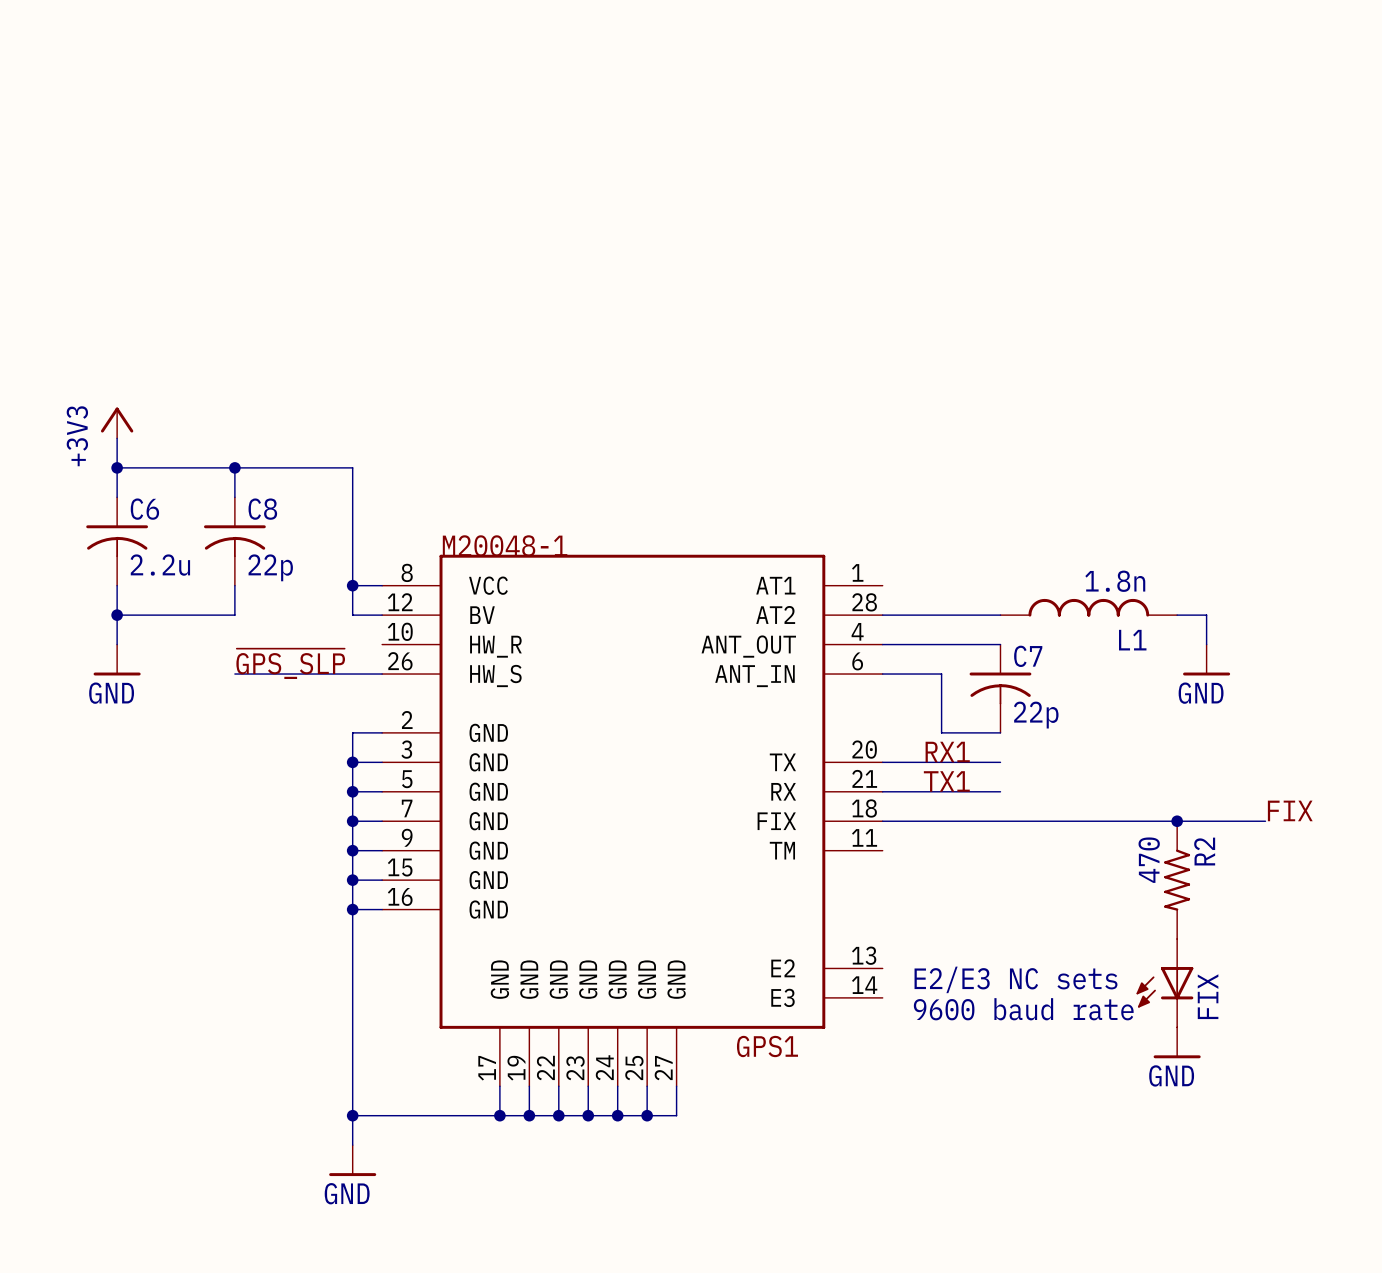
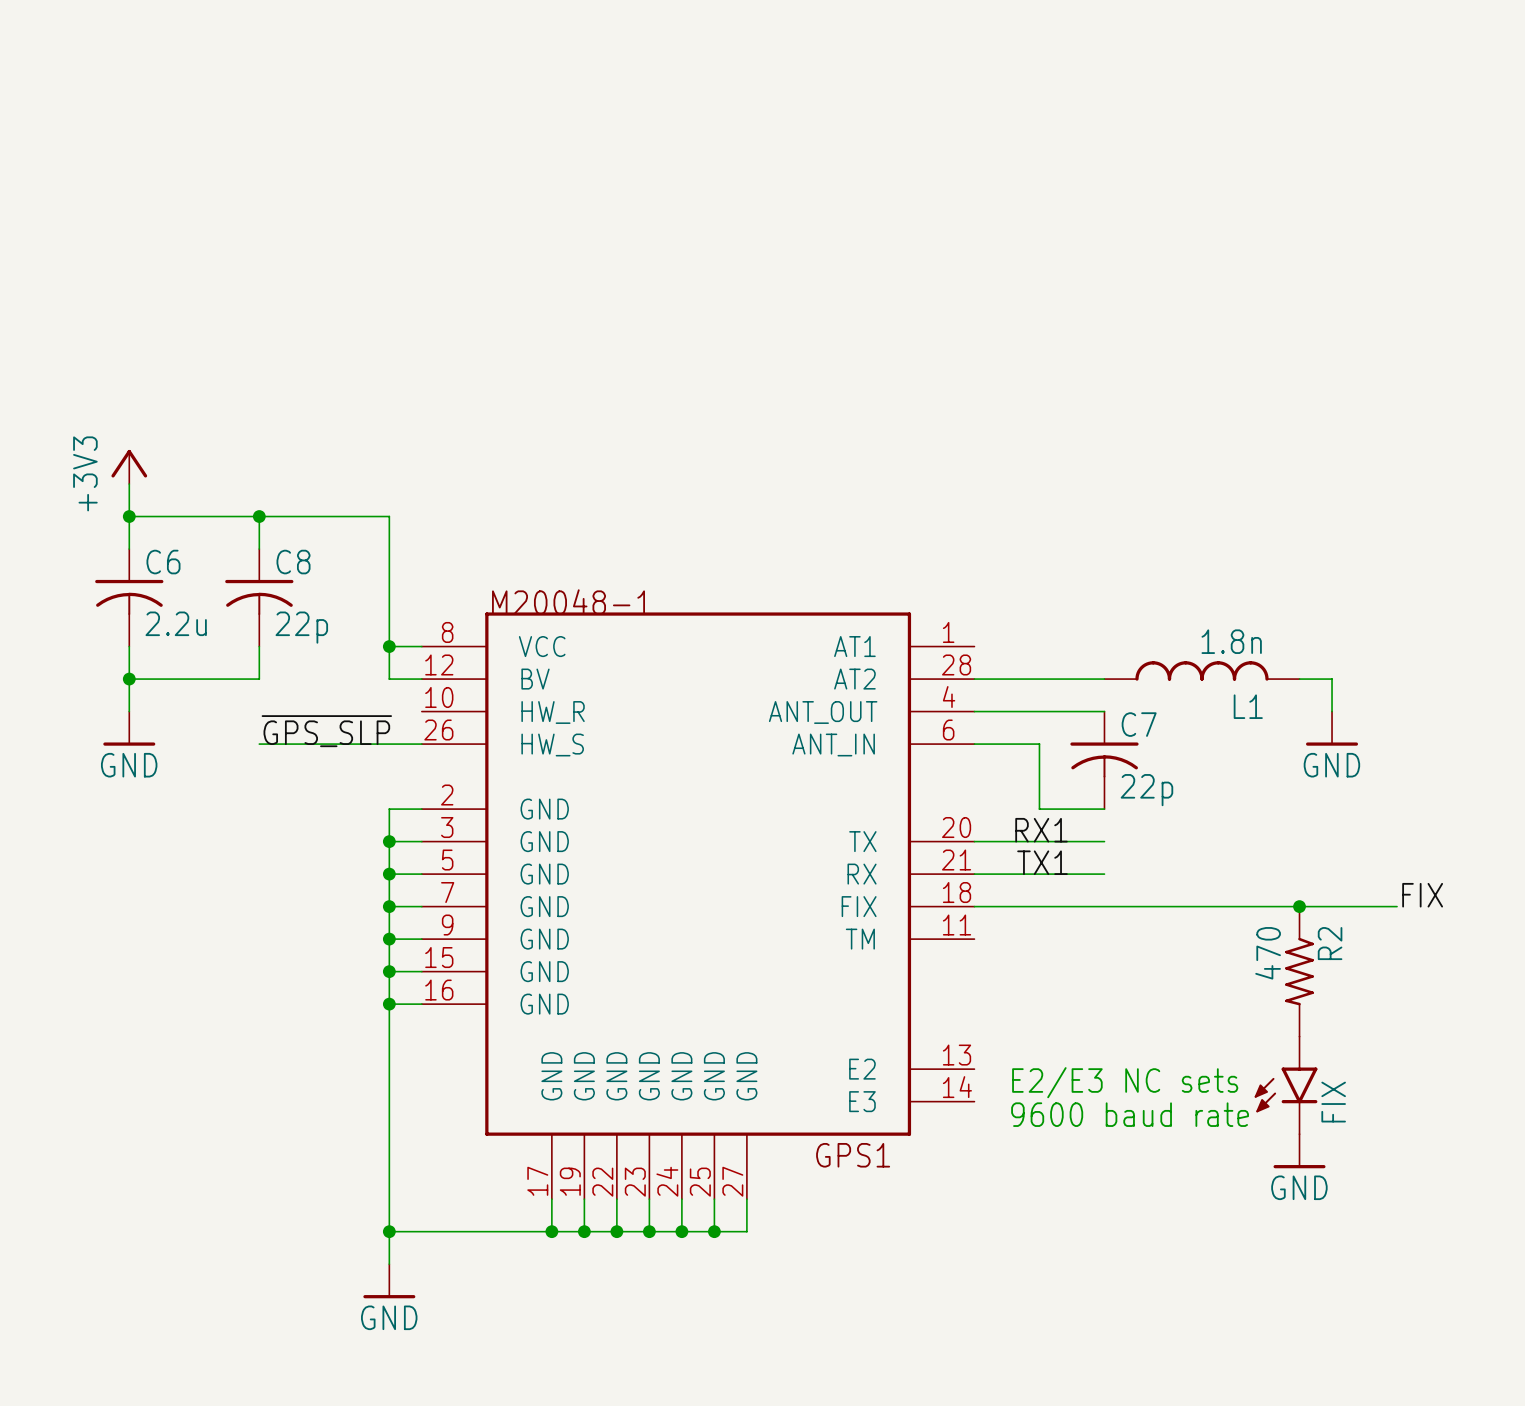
FIX symbol: [1136, 939, 1194, 1028] -> [1254, 1036, 1318, 1135]

